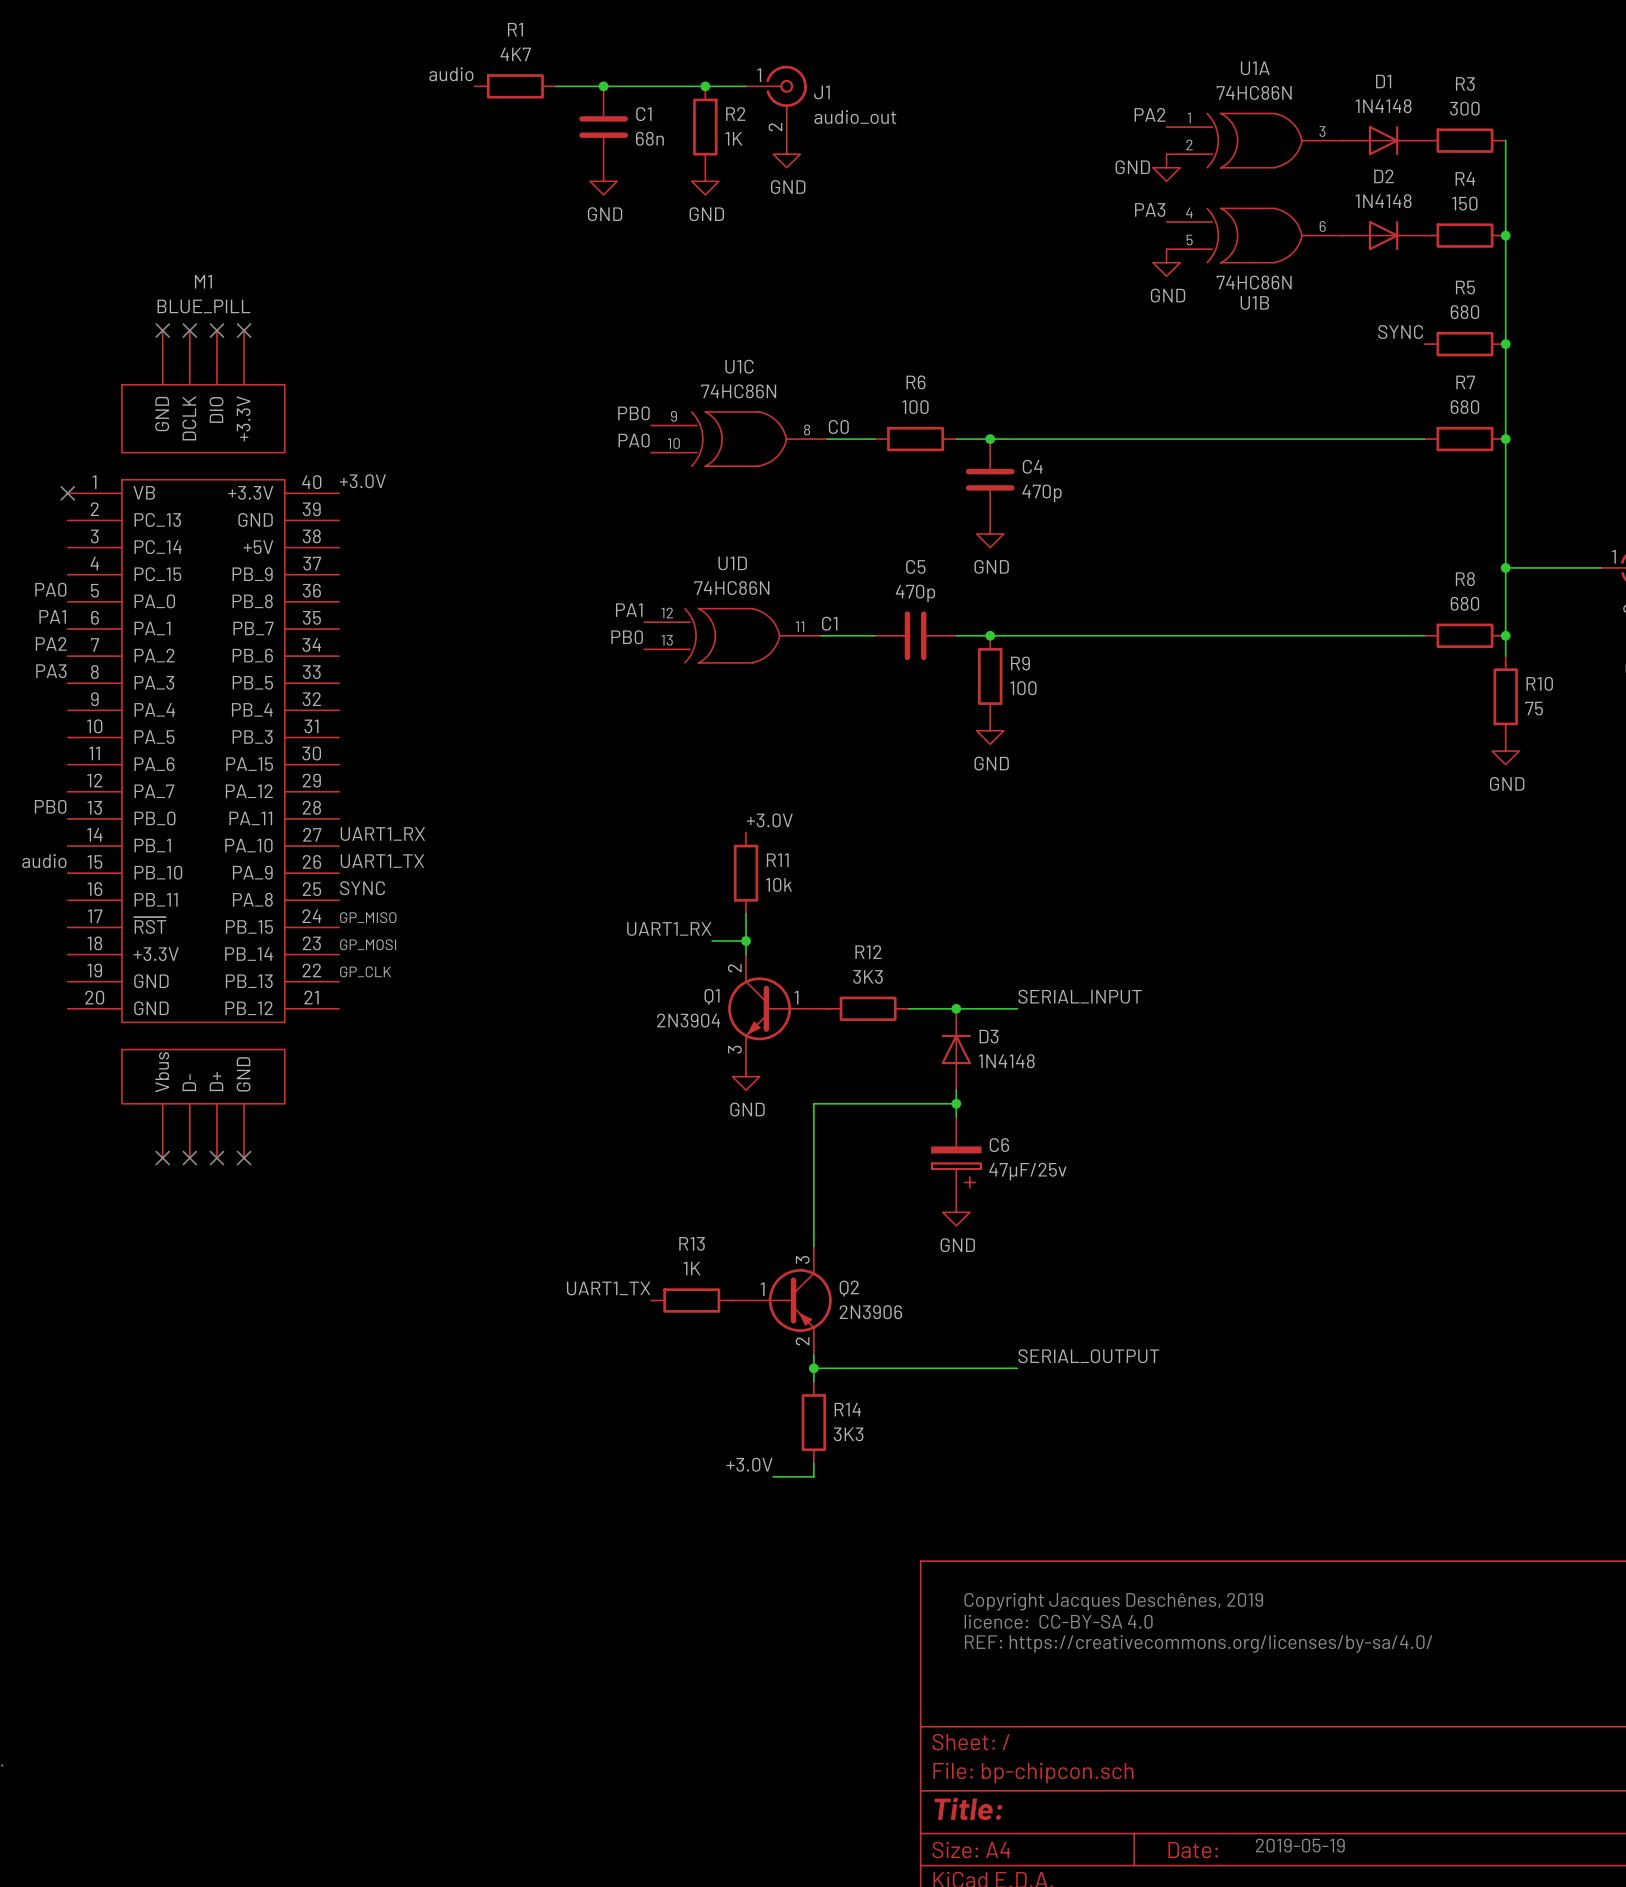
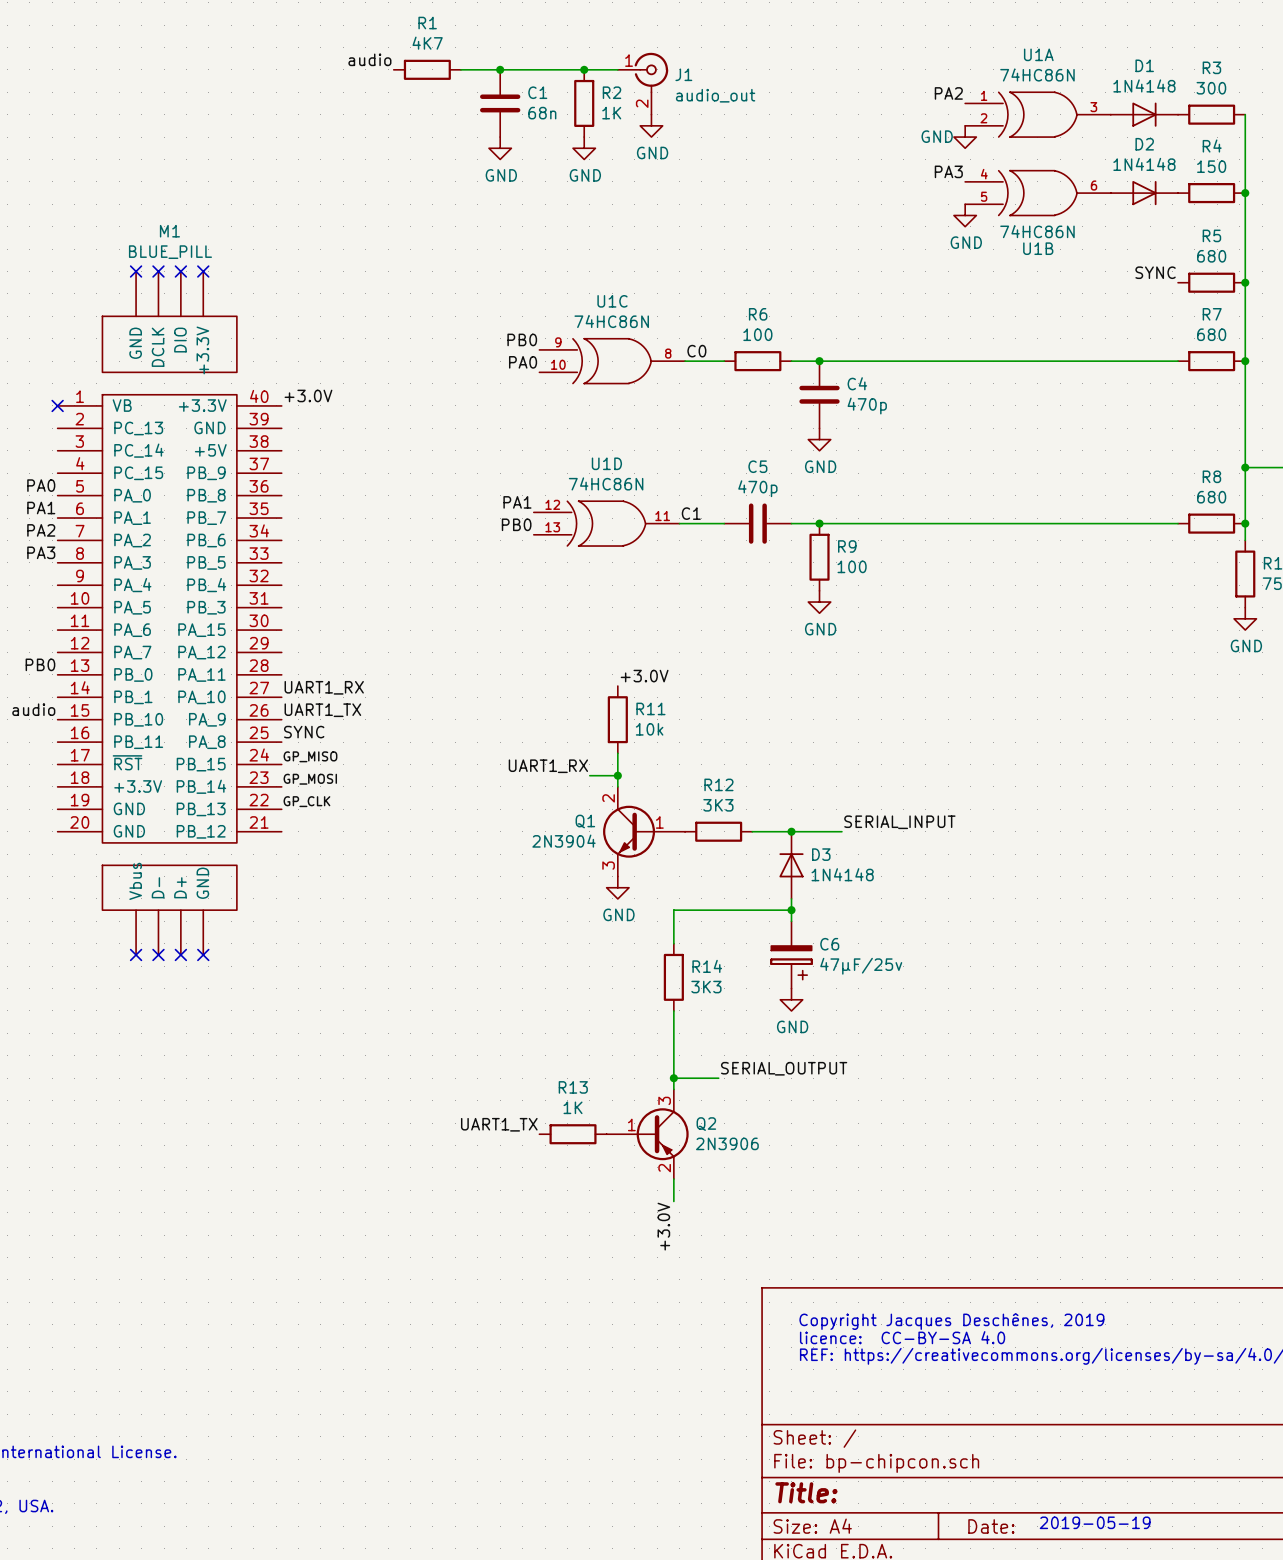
wire: (813, 1144) (813, 1225) -> none
wire: none -> (673, 1027) (673, 1089)
label position: UART1_TX (608, 1288) -> UART1_TX (499, 1124)
R13 position: (691, 1300) -> (573, 1134)
Q2 position: (782, 1300) -> (647, 1134)
wire: none -> (673, 1078) (718, 1078)
wire: (813, 1354) (813, 1381) -> (673, 1179) (673, 1201)
label position: SERIAL_OUTPUT (1088, 1356) -> SERIAL_OUTPUT (784, 1068)
wire: (813, 1368) (1017, 1368) -> none
junction position: (813, 1368) -> (673, 1078)
R14 position: (813, 1422) -> (673, 977)
wire: (813, 1463) (813, 1476) (773, 1476) -> none
label rotation: 0° (749, 1464) -> 90° counterclockwise (663, 1226)

